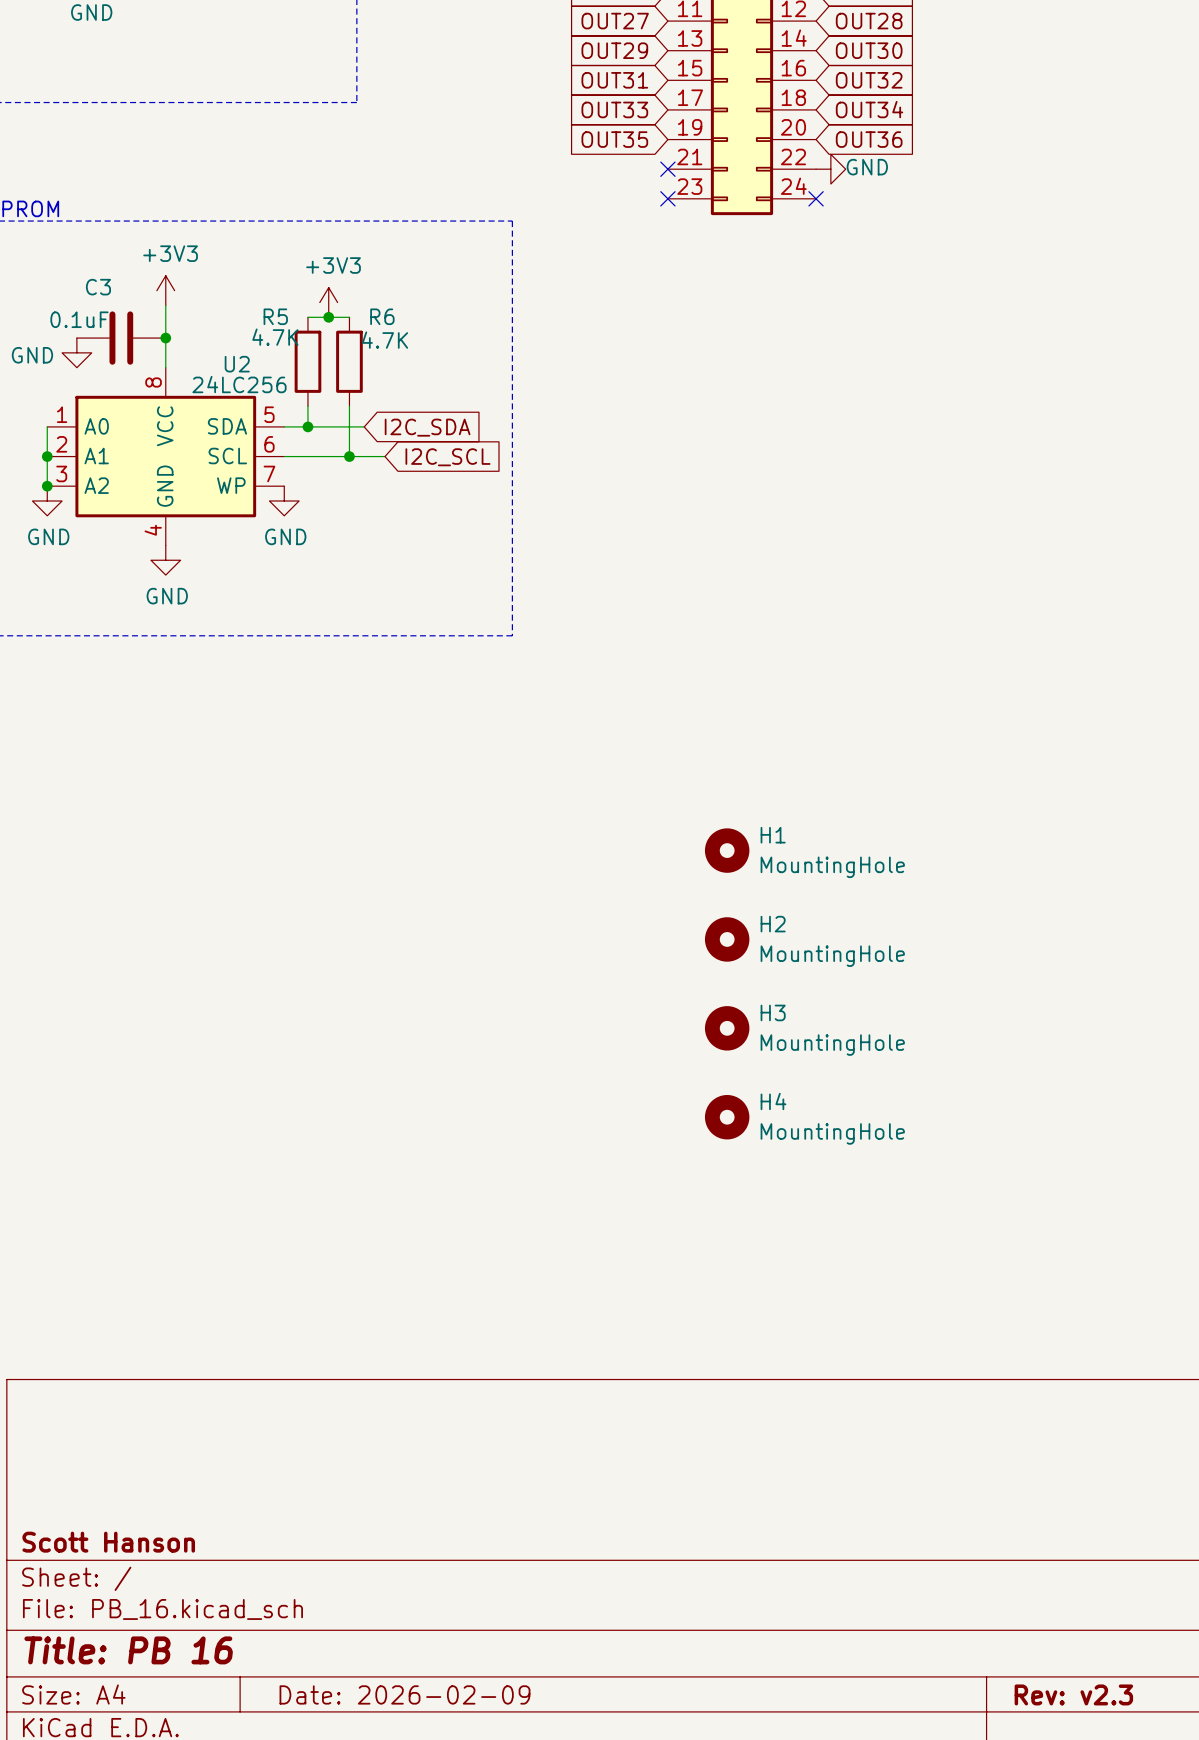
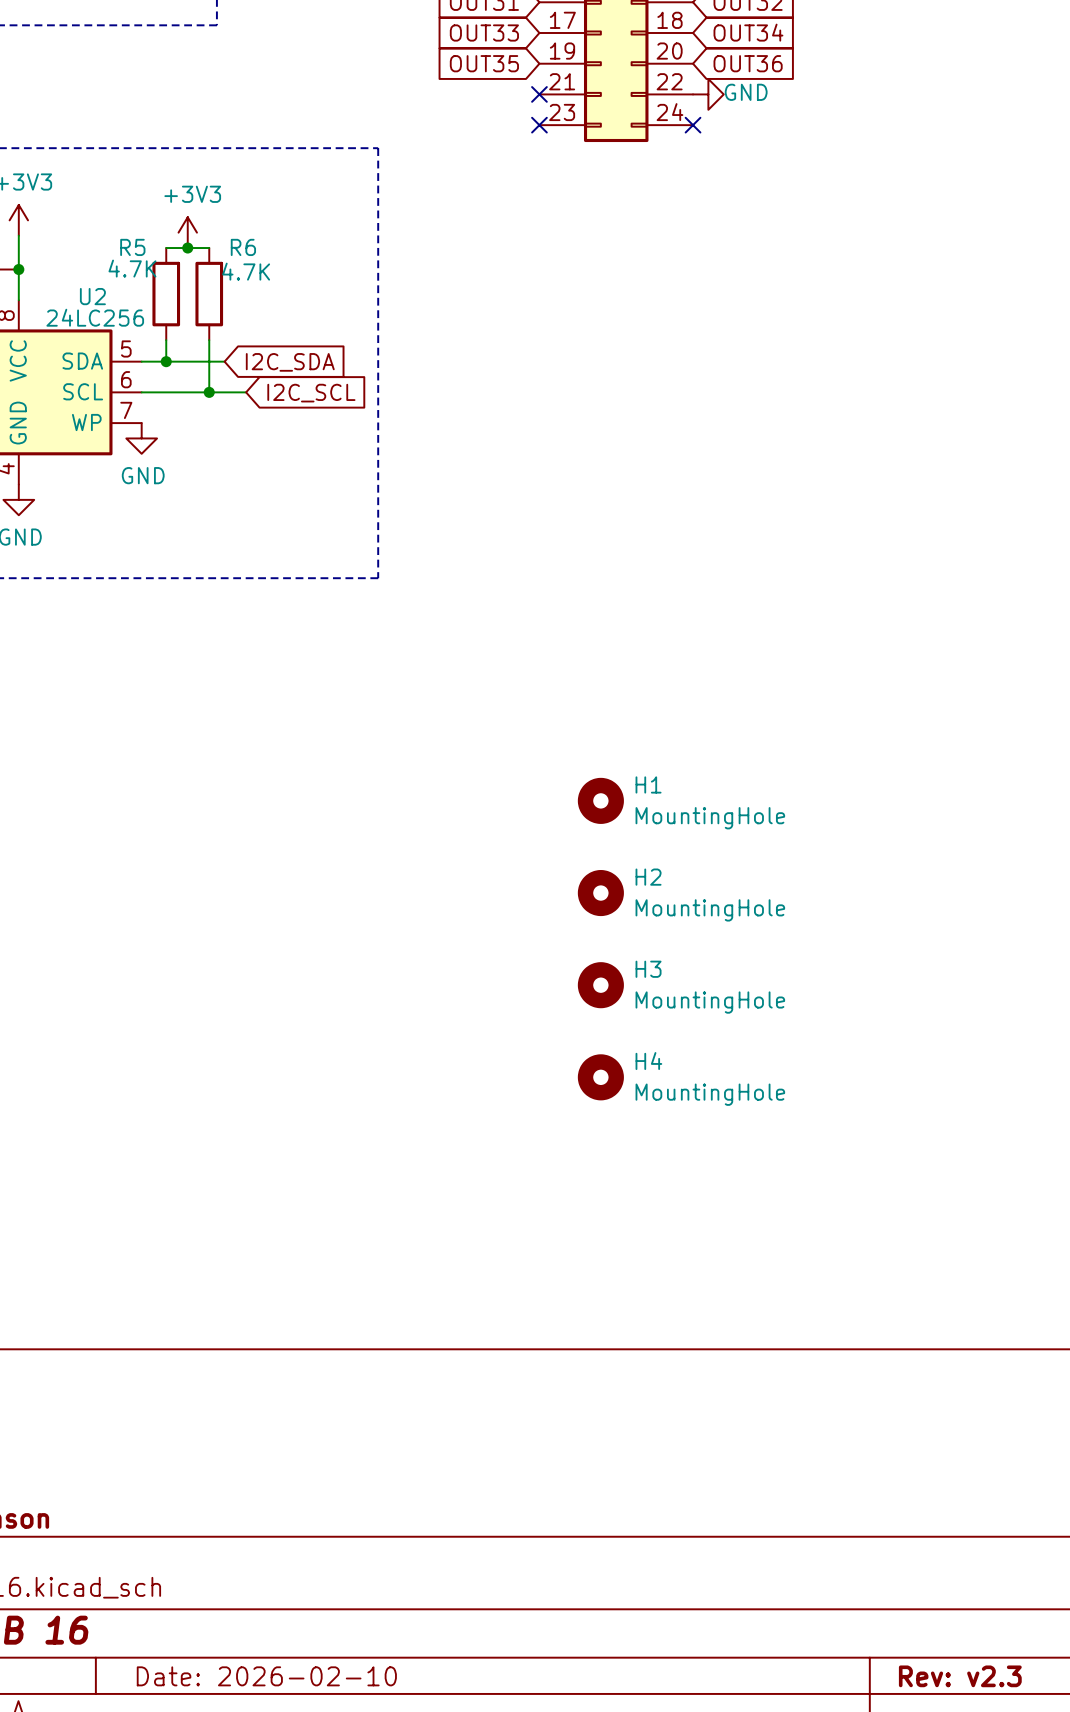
title block: Date: 2026-02-09 (404, 1694) -> Date: 2026-02-10 (266, 1676)

